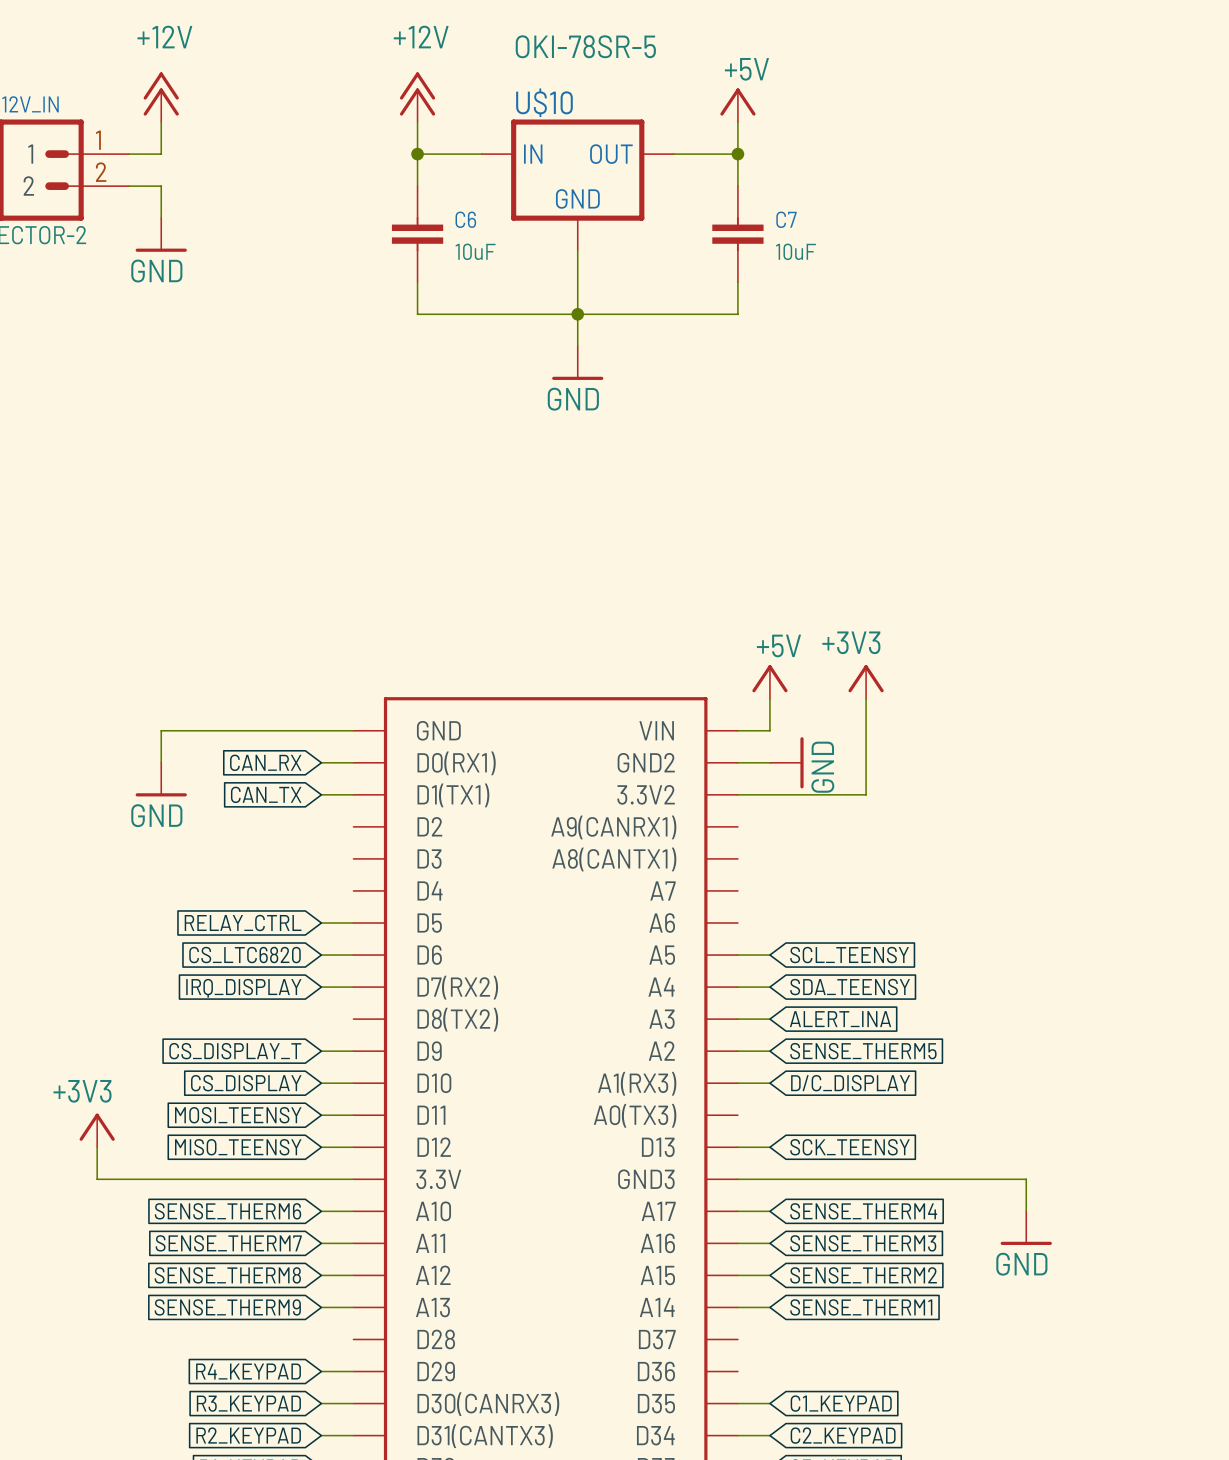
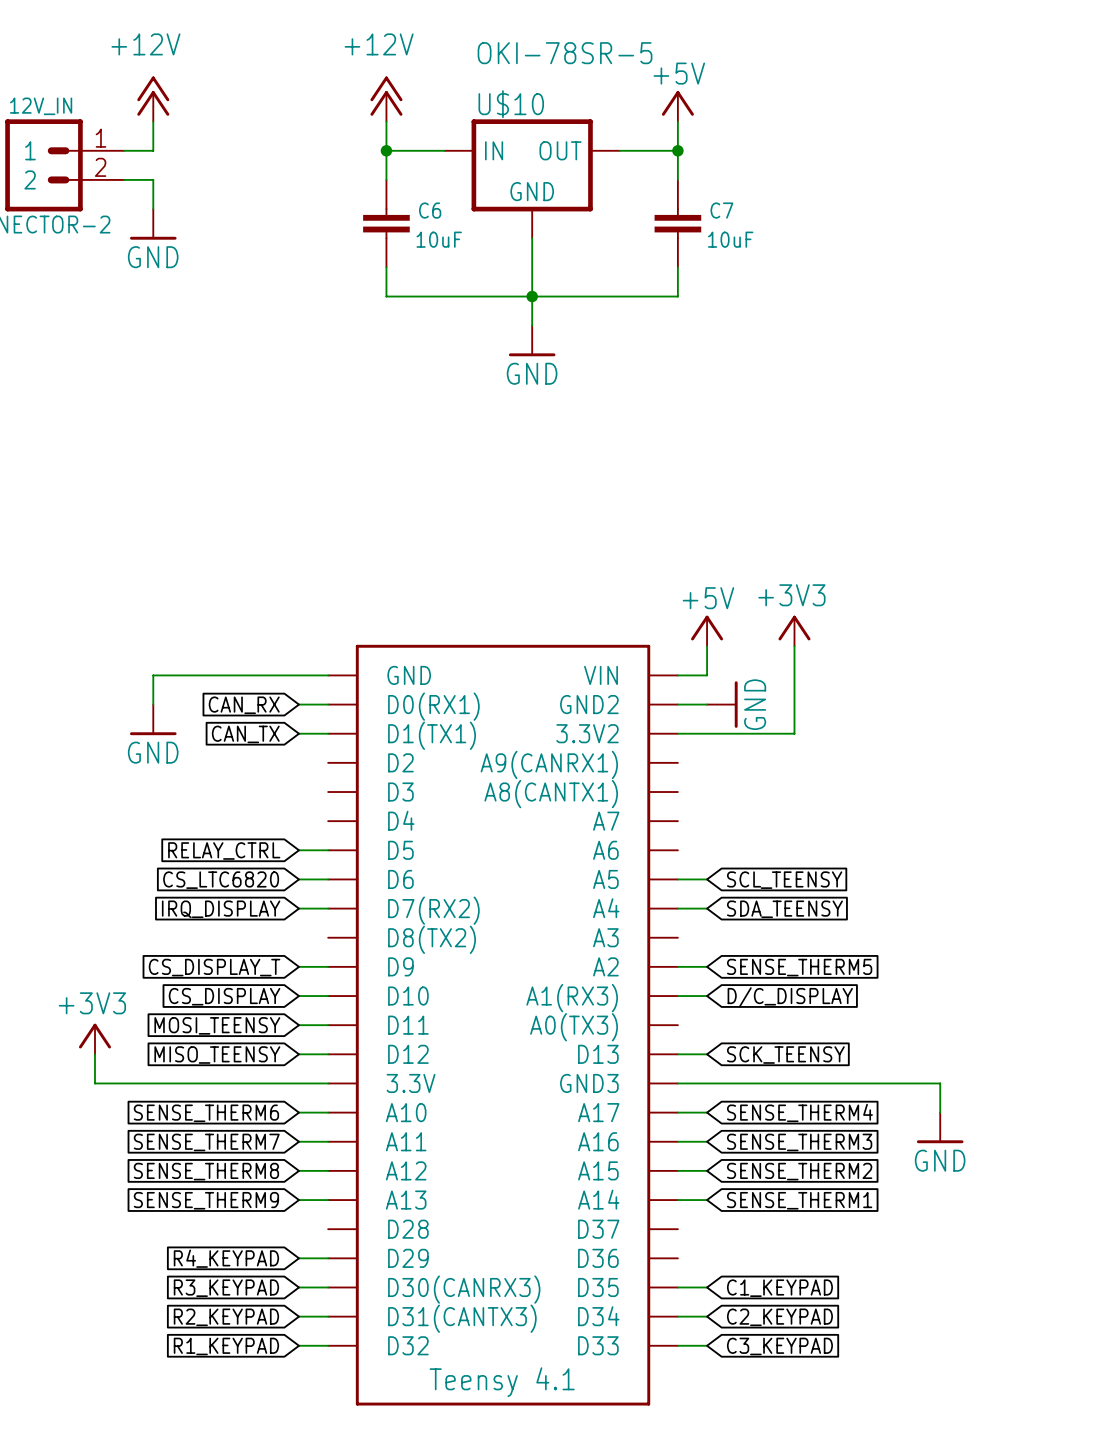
wire: (737, 1019) (769, 1019) -> none
global label: ALERT_INA (840, 1019) -> none

